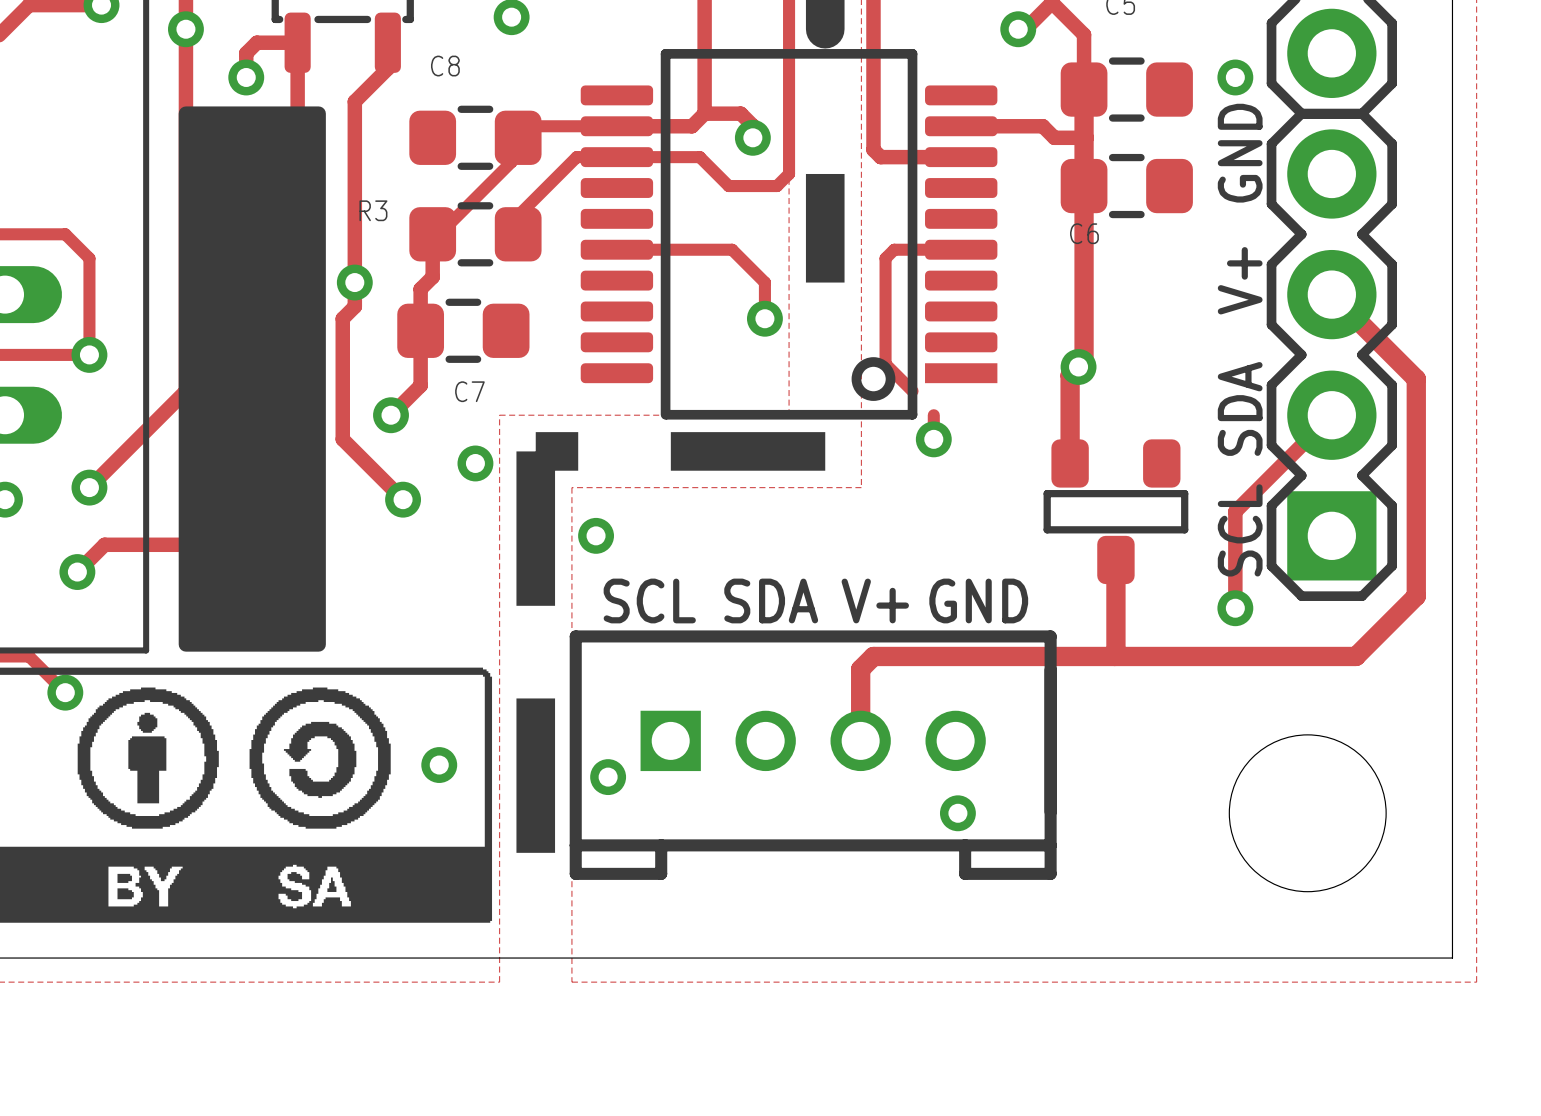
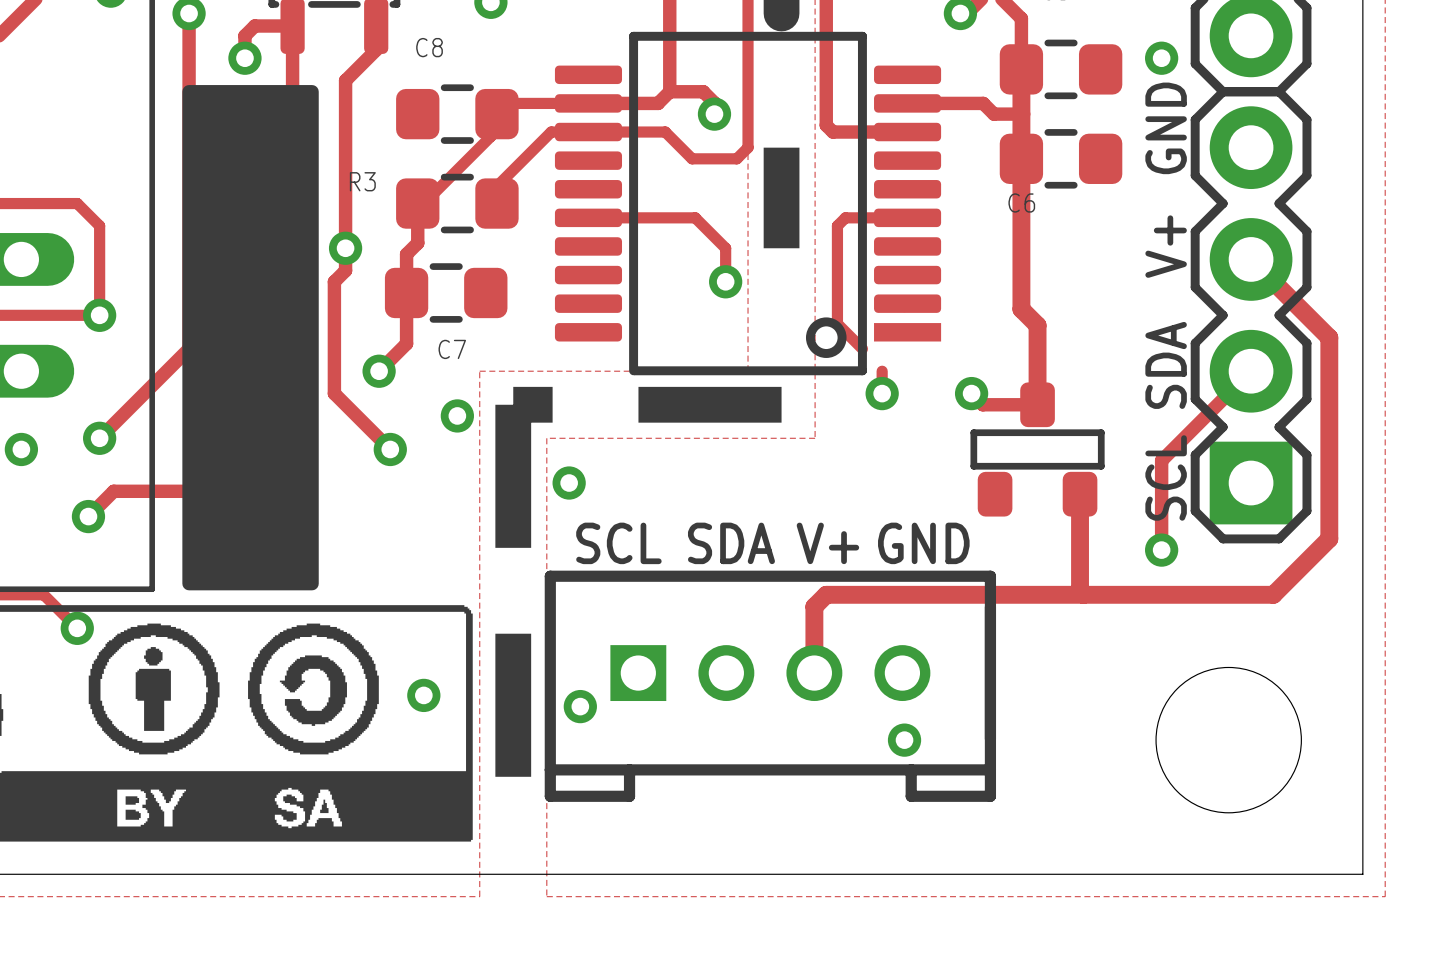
track: (1084, 348) (1084, 372) (1078, 366) (1070, 375) (1070, 463) -> (1021, 309) (1037, 325) (1037, 404) (982, 404) (971, 393)
via position: (1078, 366) -> (971, 393)
part rotation: 0° (1115, 511) -> 180° (1037, 449)
track: none -> (1080, 494) (1080, 591) (1083, 594)
track: (1115, 559) (1114, 656) -> none

